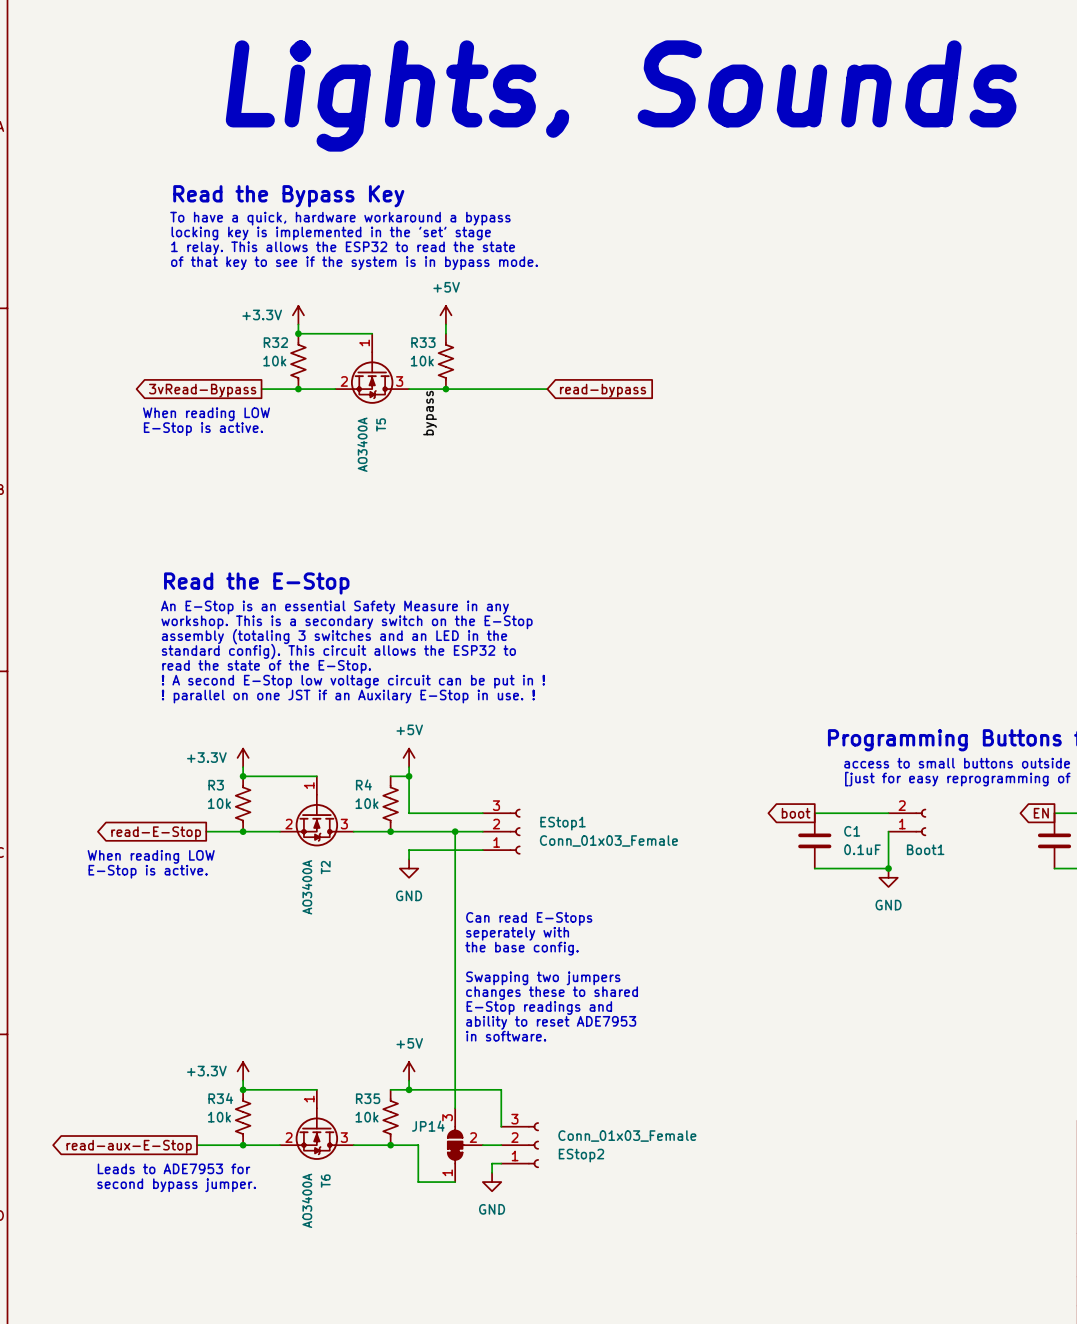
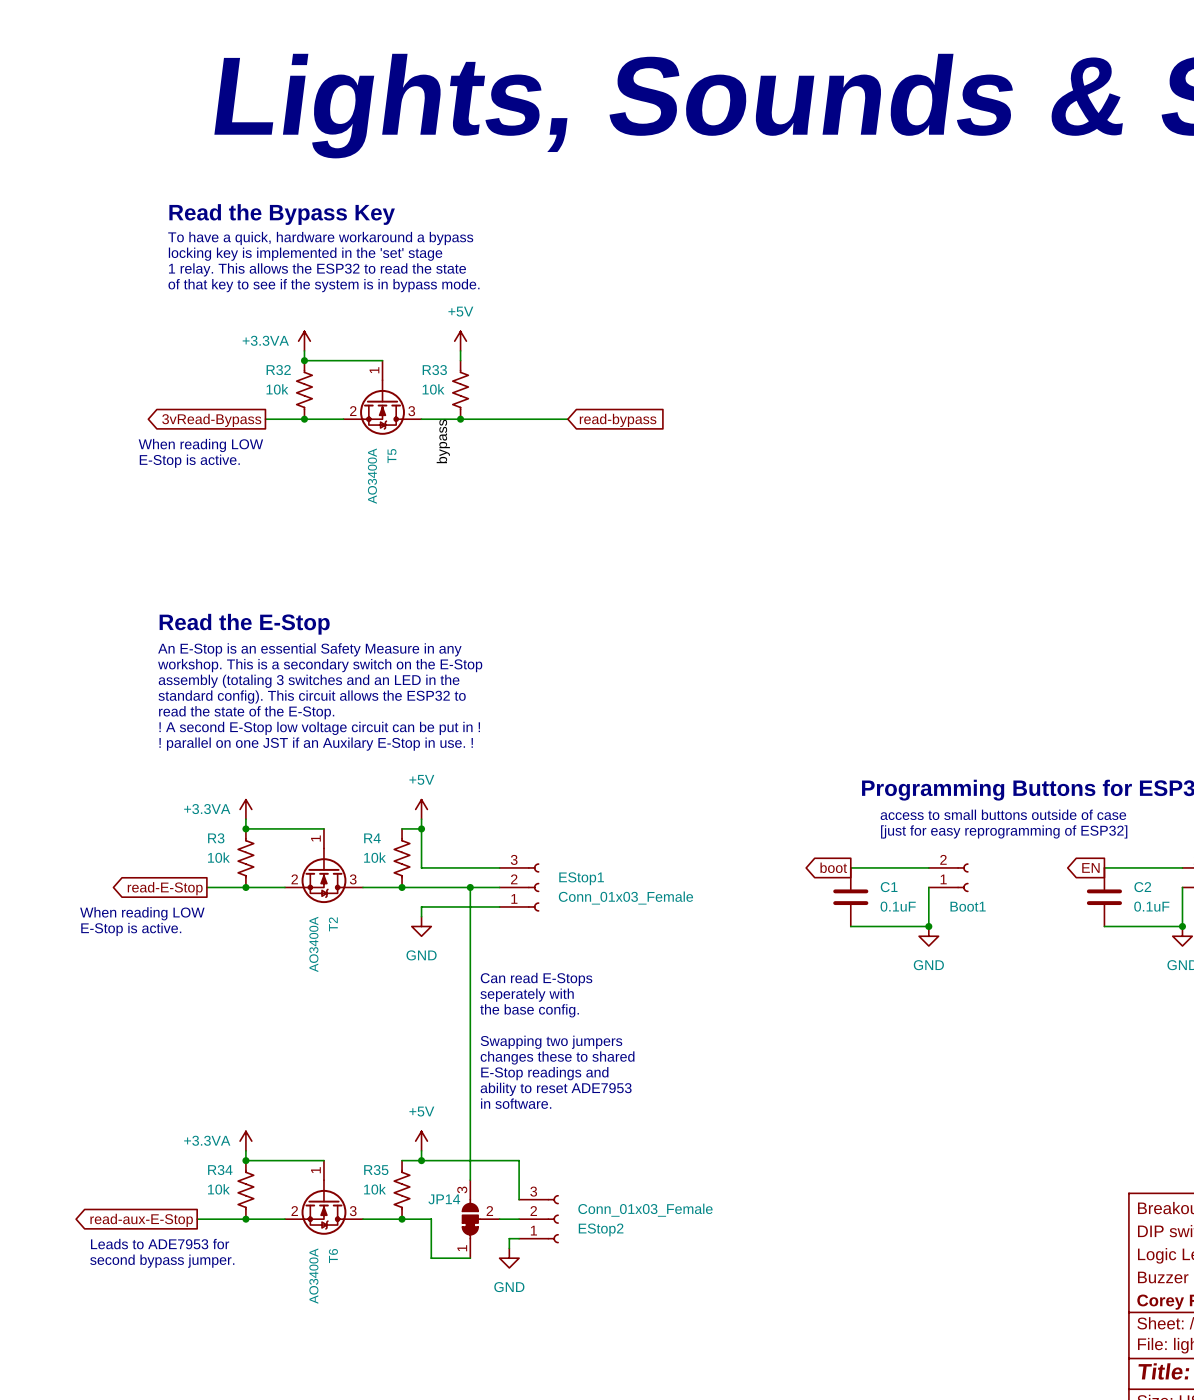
power symbol: +3.3V (298, 315) -> +3.3VA (304, 341)
power symbol: +3.3V (243, 757) -> +3.3VA (245, 809)
power symbol: +3.3V (243, 1071) -> +3.3VA (245, 1141)

